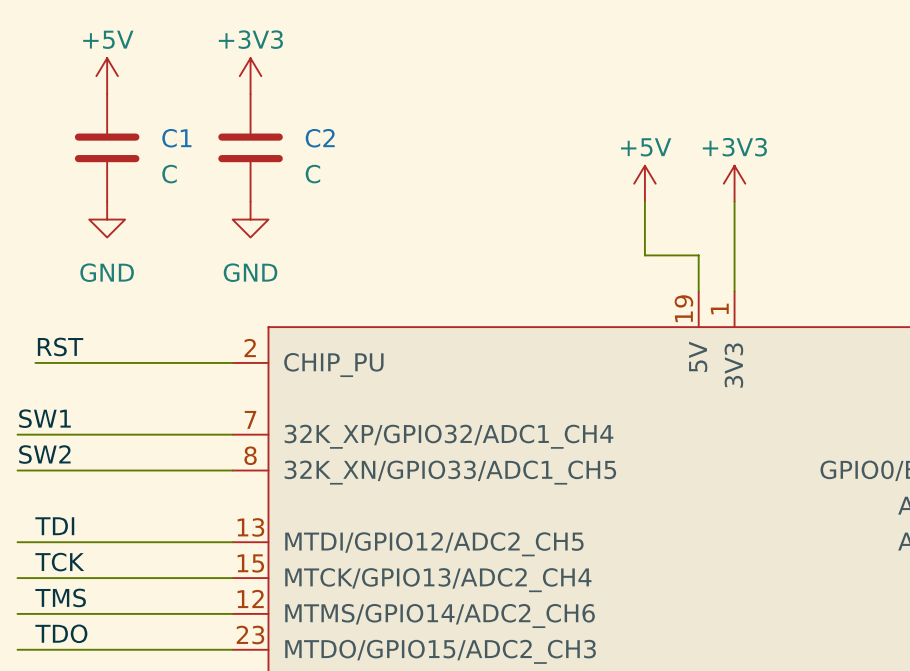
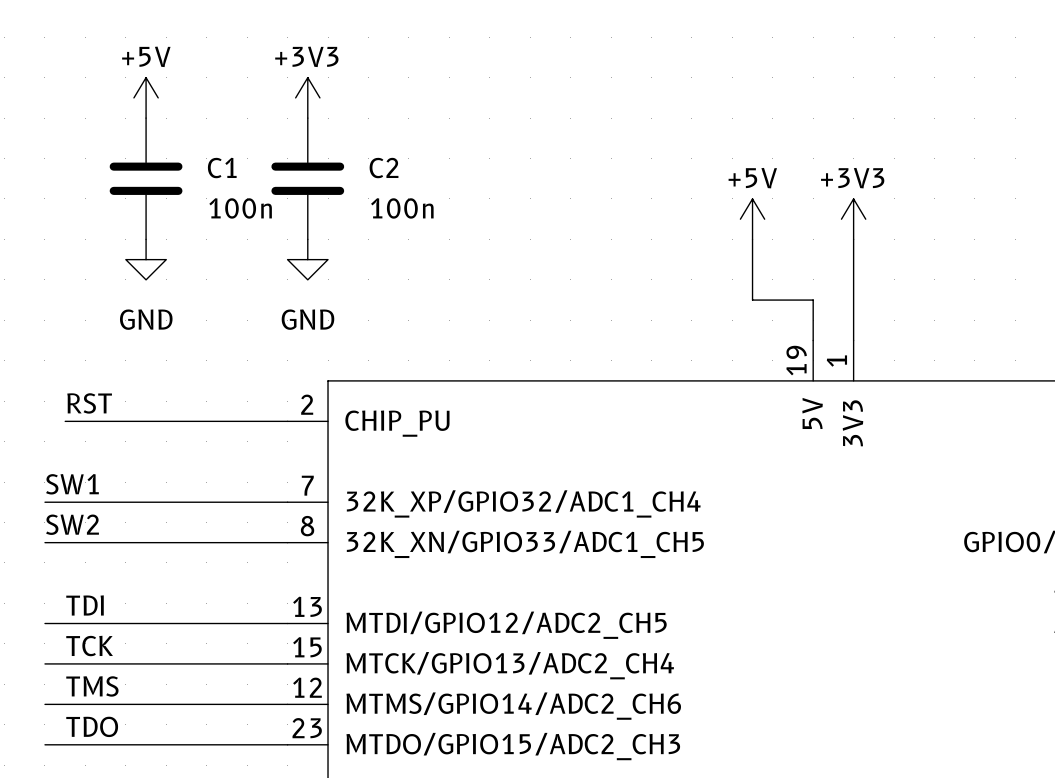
C1 value: C (169, 174) -> 100n (240, 208)
C2 value: C (312, 174) -> 100n (402, 208)

